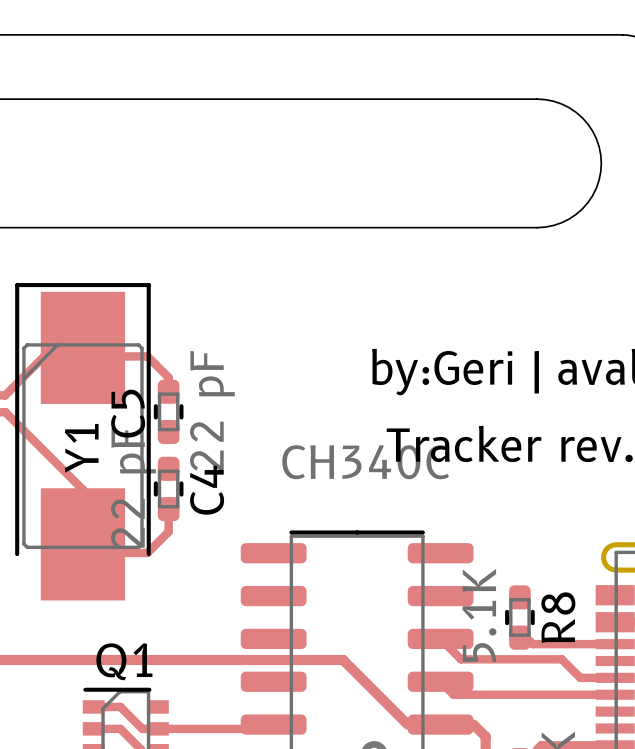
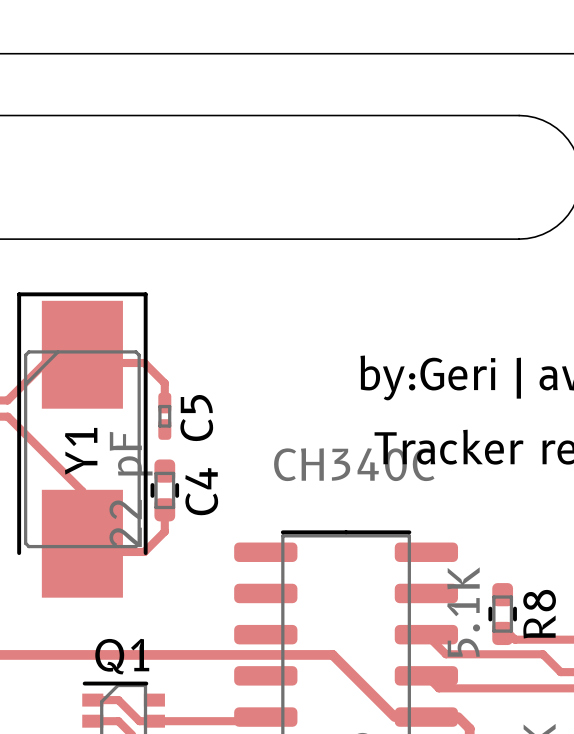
C5 footprint: [153, 379, 184, 445] -> [158, 392, 172, 440]
C5 value: 22 pF (212, 410) -> none
C5 name position: C5 (128, 413) -> C5 (196, 418)

